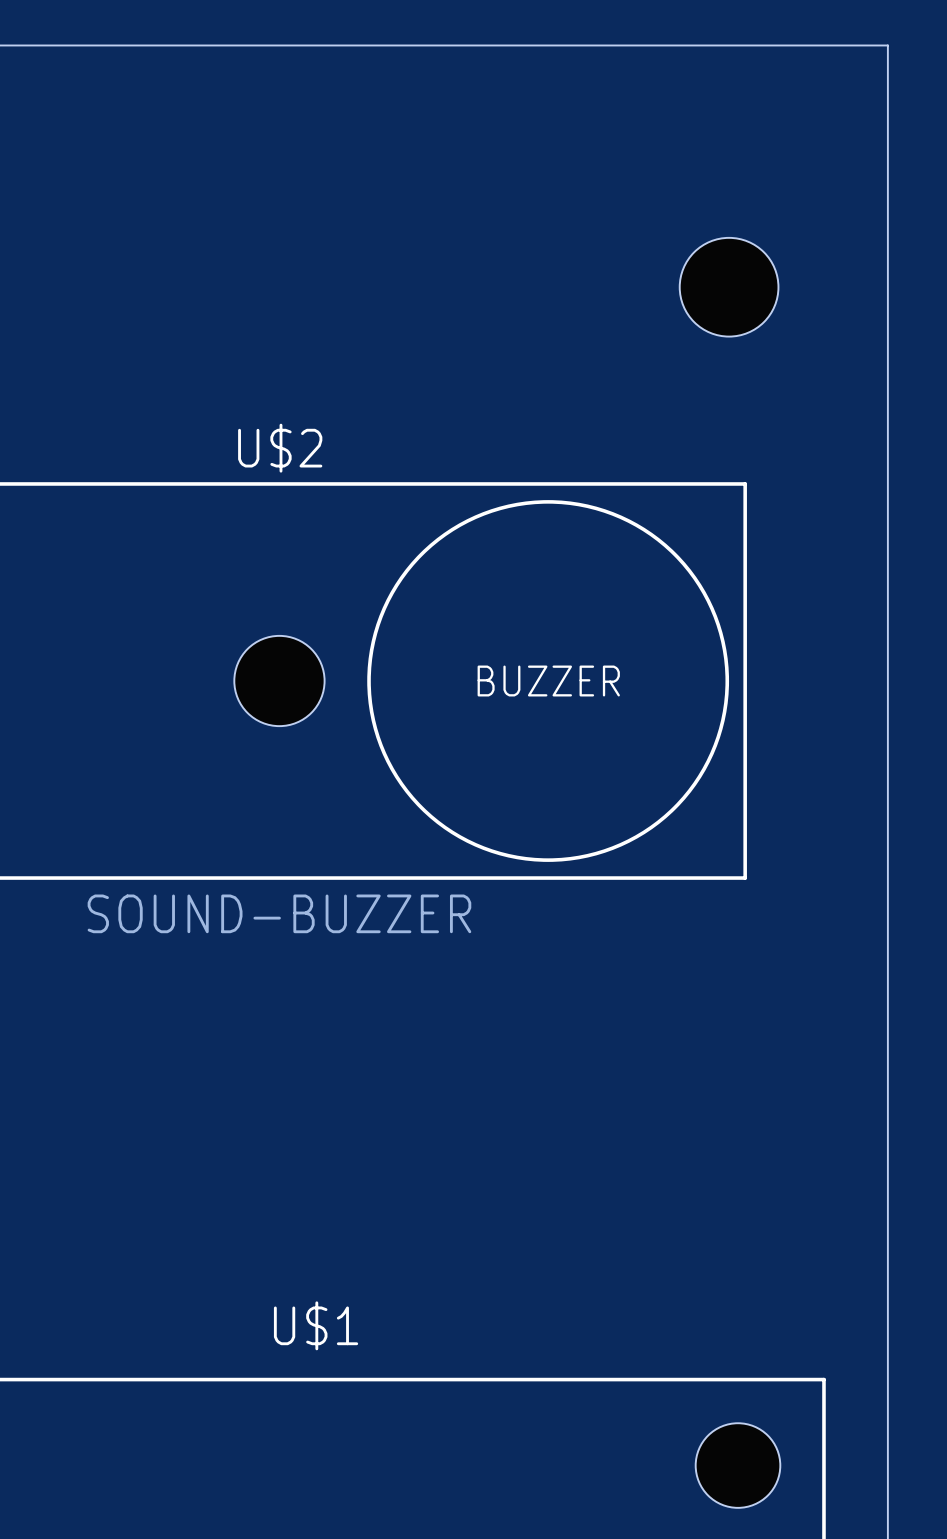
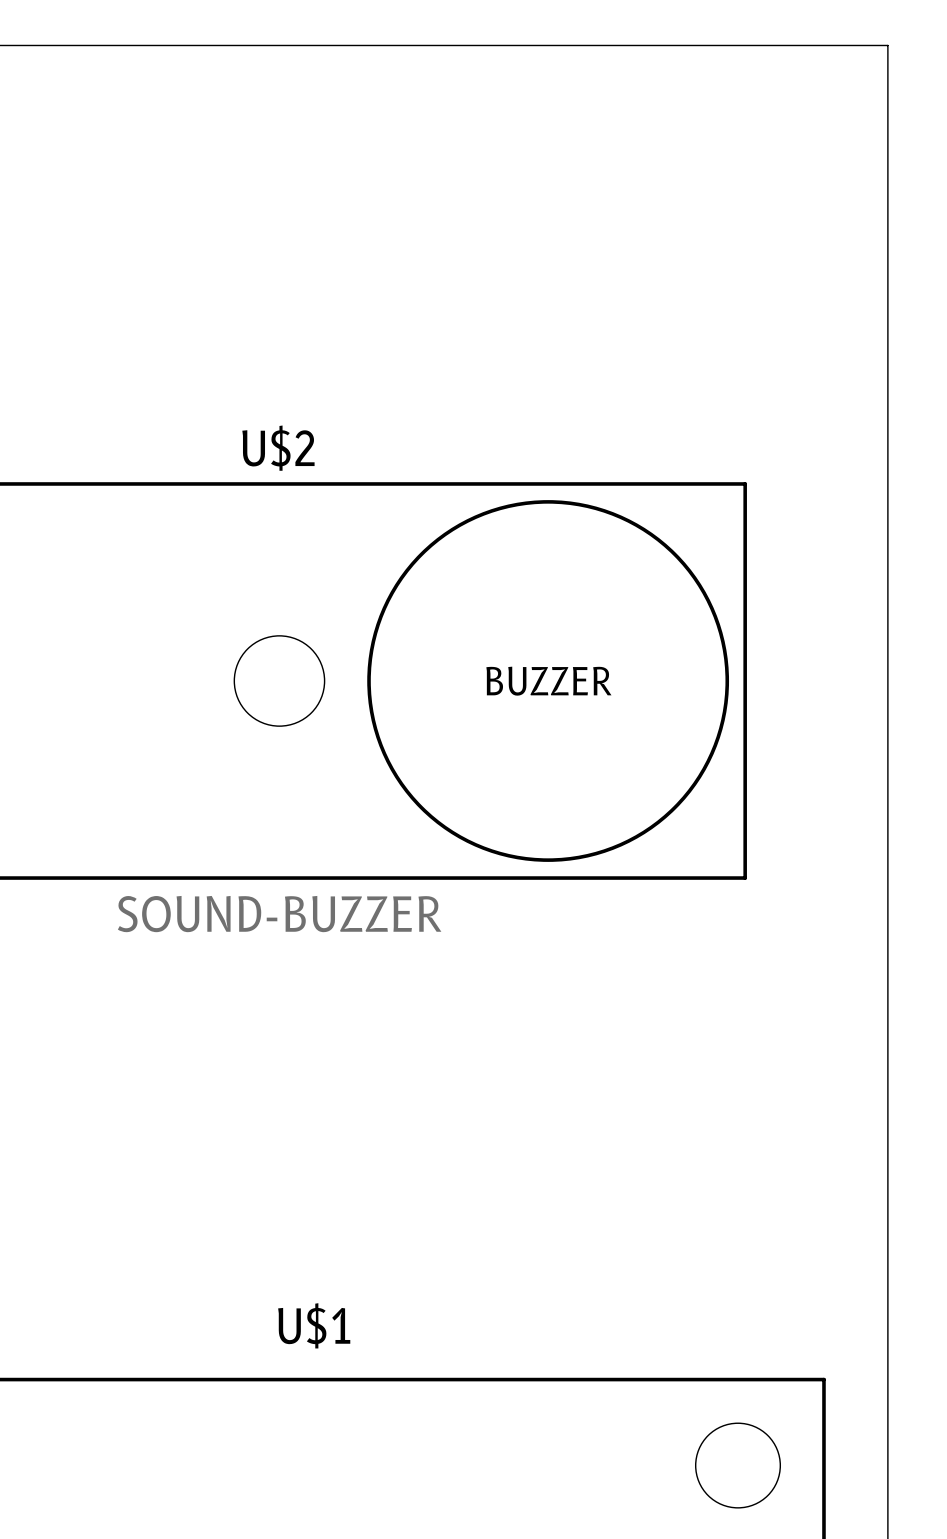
hole: (729, 287) -> none

